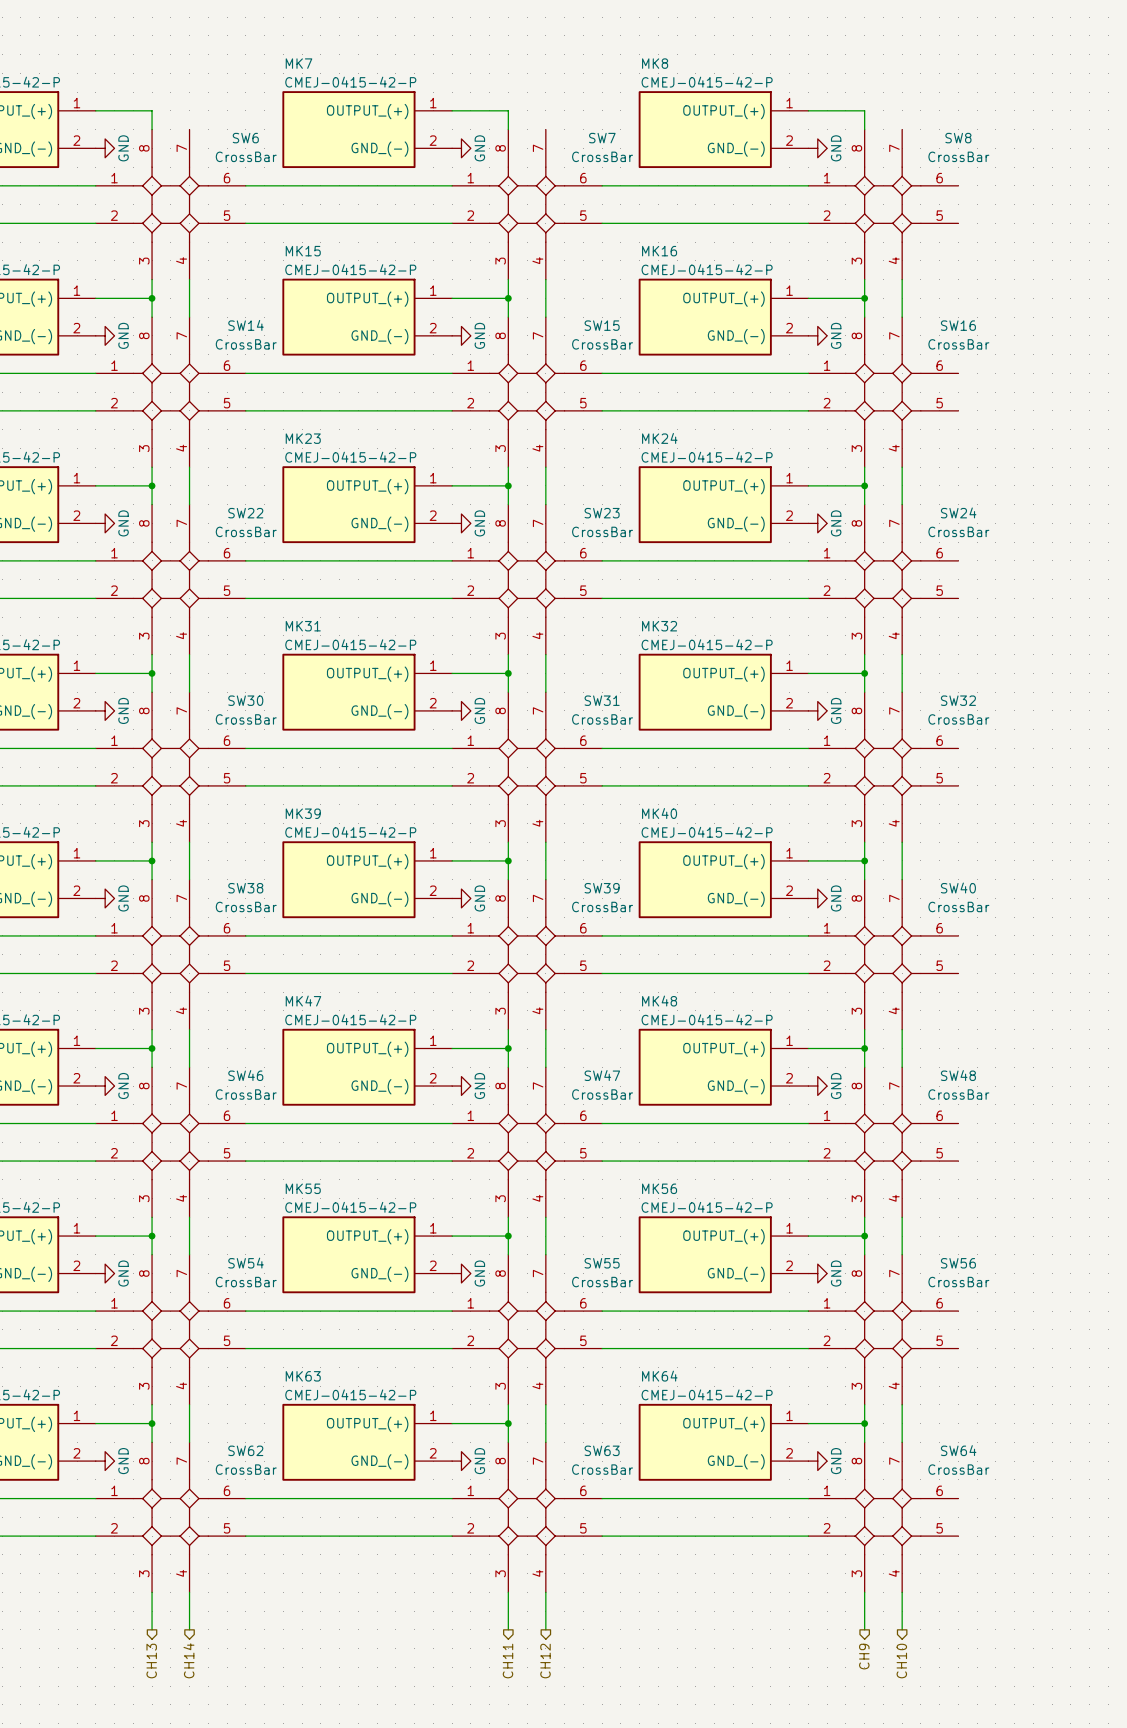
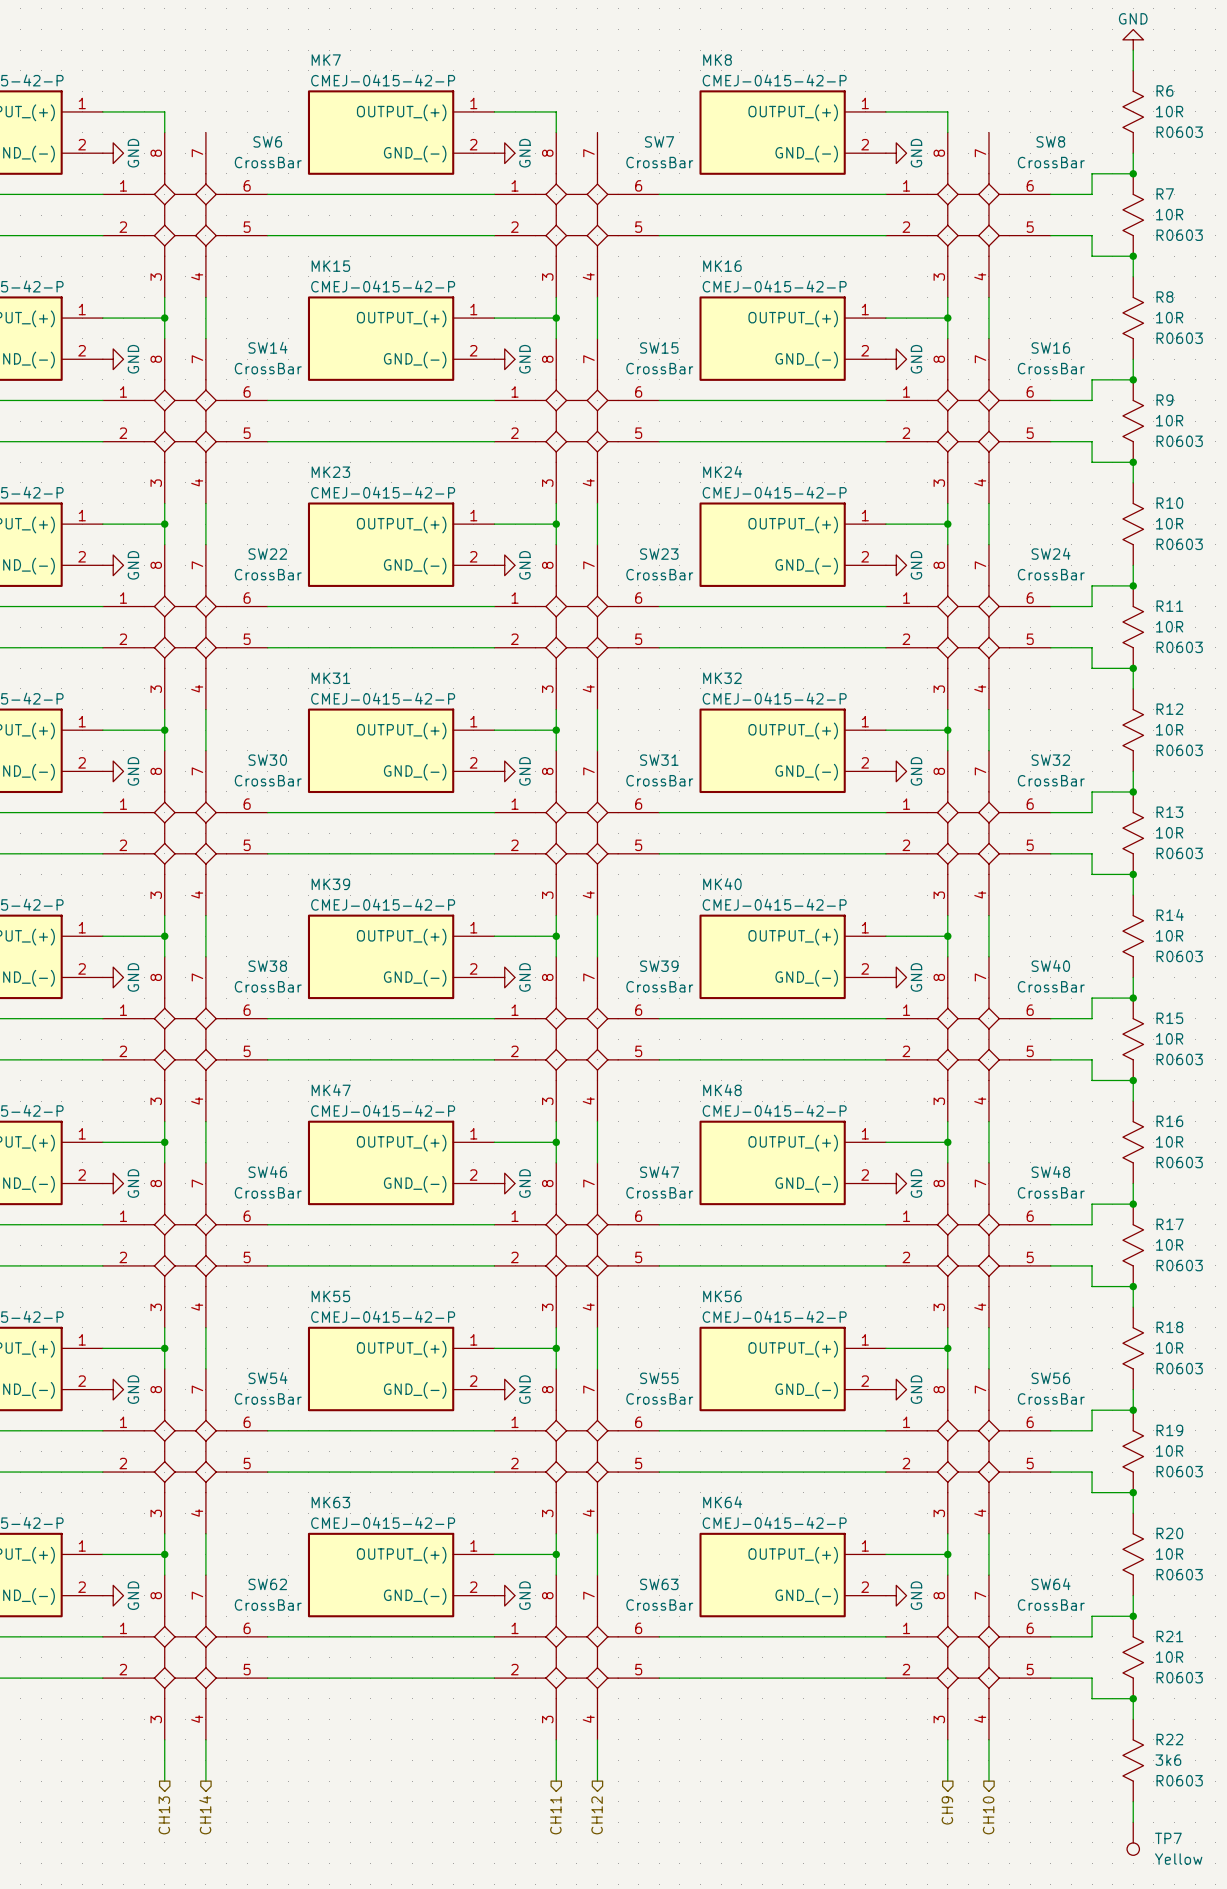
power symbol: none -> GND (1133, 39)
wire: none -> (1133, 50) (1133, 70)
R6: none -> (1133, 111)
wire: none -> (1133, 153) (1133, 173) (1092, 173) (1092, 194) (1050, 194)
junction: none -> (1133, 173)
R7: none -> (1133, 215)
wire: none -> (1050, 235) (1092, 235) (1092, 256) (1133, 256) (1133, 276)
junction: none -> (1133, 256)
R8: none -> (1133, 318)
wire: none -> (1133, 359) (1133, 379) (1092, 379) (1092, 400) (1050, 400)
junction: none -> (1133, 379)
R9: none -> (1133, 421)
wire: none -> (1050, 441) (1092, 441) (1092, 462) (1133, 462) (1133, 482)
junction: none -> (1133, 462)
R10: none -> (1133, 524)
wire: none -> (1133, 565) (1133, 585) (1092, 585) (1092, 606) (1050, 606)
junction: none -> (1133, 585)
R11: none -> (1133, 627)
wire: none -> (1050, 647) (1092, 647) (1092, 668) (1133, 668) (1133, 688)
junction: none -> (1133, 668)
R12: none -> (1133, 730)
wire: none -> (1133, 771) (1133, 791) (1092, 791) (1092, 812) (1050, 812)
junction: none -> (1133, 791)
R13: none -> (1133, 833)
wire: none -> (1050, 853) (1092, 853) (1092, 874) (1133, 874) (1133, 895)
junction: none -> (1133, 874)
R14: none -> (1133, 936)
wire: none -> (1133, 977) (1133, 998) (1092, 998) (1092, 1018) (1050, 1018)
junction: none -> (1133, 998)
R15: none -> (1133, 1039)
wire: none -> (1050, 1059) (1092, 1059) (1092, 1080) (1133, 1080) (1133, 1101)
junction: none -> (1133, 1080)
R16: none -> (1133, 1142)
wire: none -> (1133, 1183) (1133, 1204) (1092, 1204) (1092, 1224) (1050, 1224)
junction: none -> (1133, 1204)
R17: none -> (1133, 1245)
wire: none -> (1050, 1265) (1092, 1265) (1092, 1286) (1133, 1286) (1133, 1307)
junction: none -> (1133, 1286)
R18: none -> (1133, 1348)
wire: none -> (1133, 1389) (1133, 1410) (1092, 1410) (1092, 1430) (1050, 1430)
junction: none -> (1133, 1410)
R19: none -> (1133, 1451)
wire: none -> (1050, 1472) (1092, 1472) (1092, 1492) (1133, 1492) (1133, 1513)
junction: none -> (1133, 1492)
R20: none -> (1133, 1554)
wire: none -> (1133, 1595) (1133, 1616) (1092, 1616) (1092, 1636) (1050, 1636)
junction: none -> (1133, 1616)
R21: none -> (1133, 1657)
wire: none -> (1050, 1678) (1092, 1678) (1092, 1698) (1133, 1698) (1133, 1719)
junction: none -> (1133, 1698)
R22: none -> (1133, 1760)
wire: none -> (1133, 1801) (1133, 1822)
TP7: none -> (1133, 1838)

